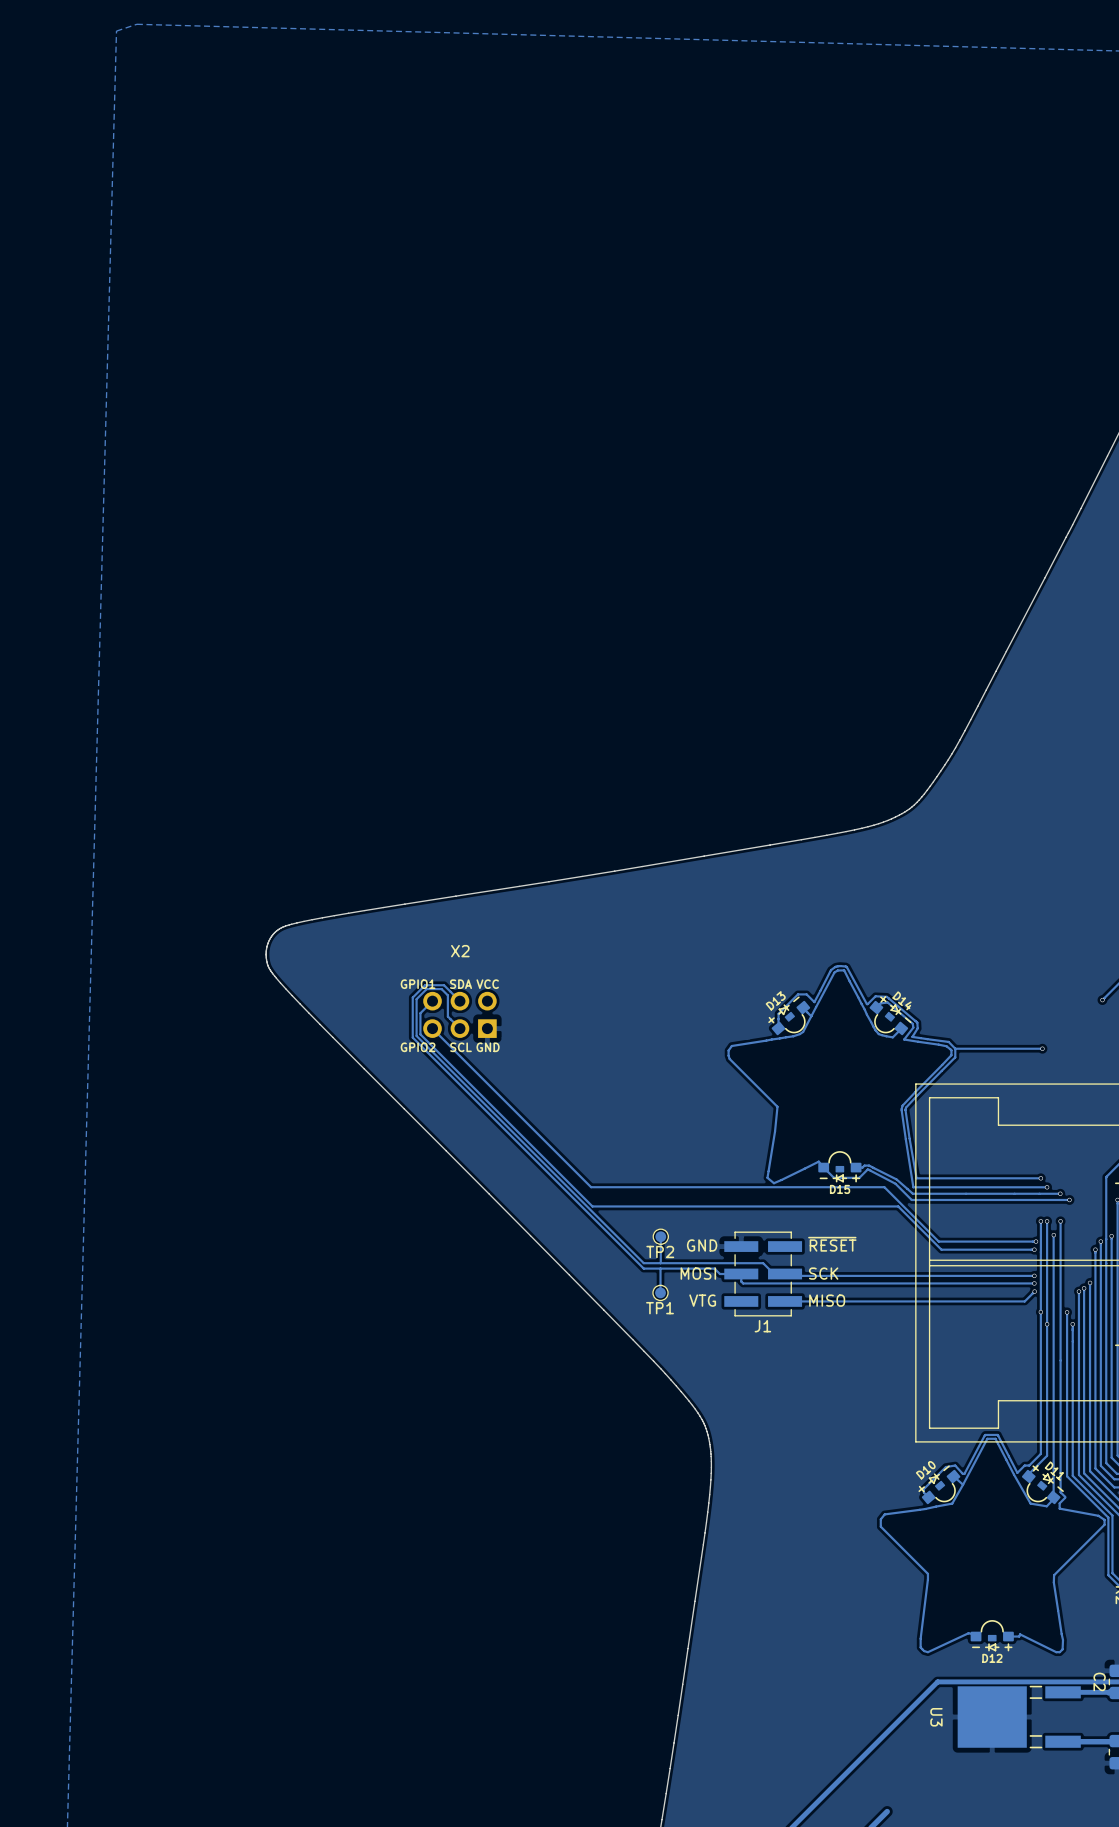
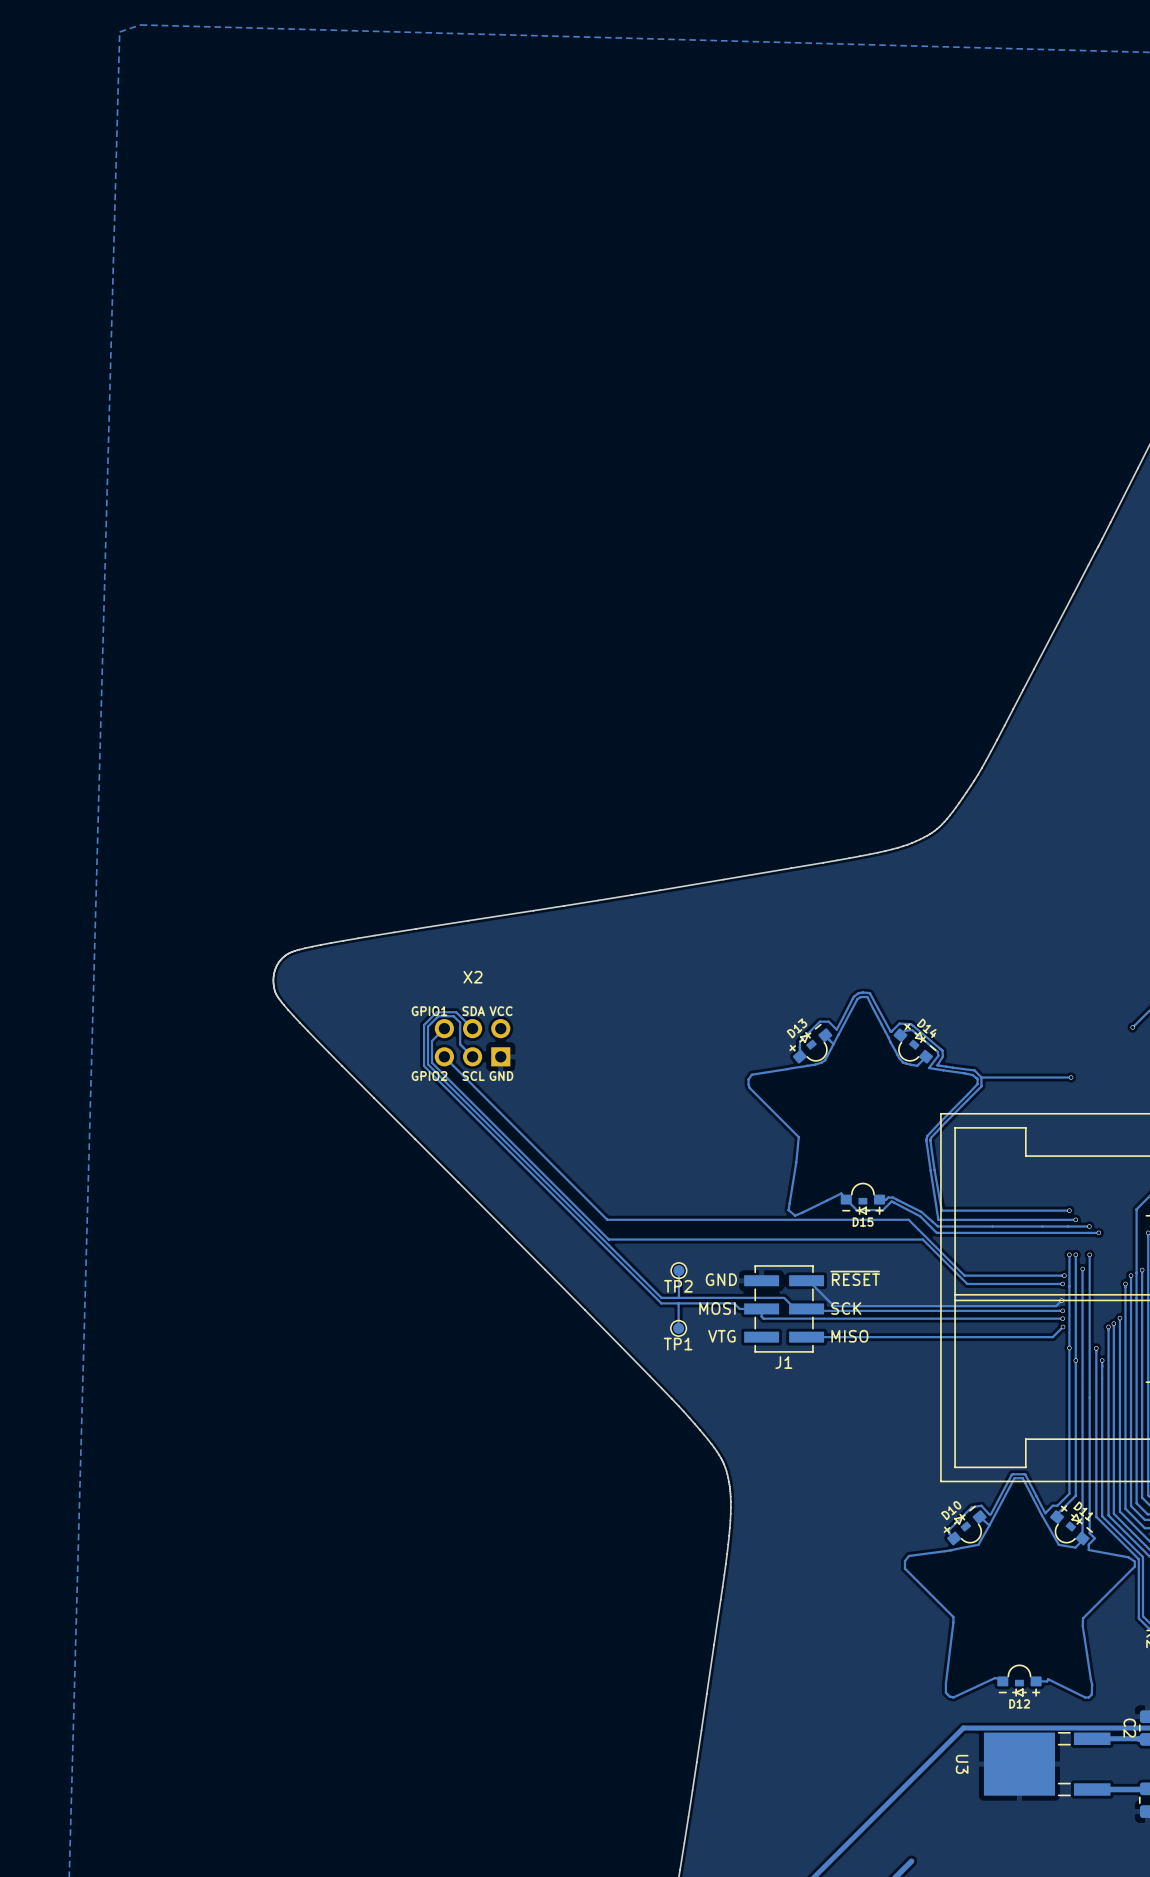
track: none -> (806, 1280) (834, 1306) (1056, 1306) (1061, 1300)
via: none -> (1061, 1300)

